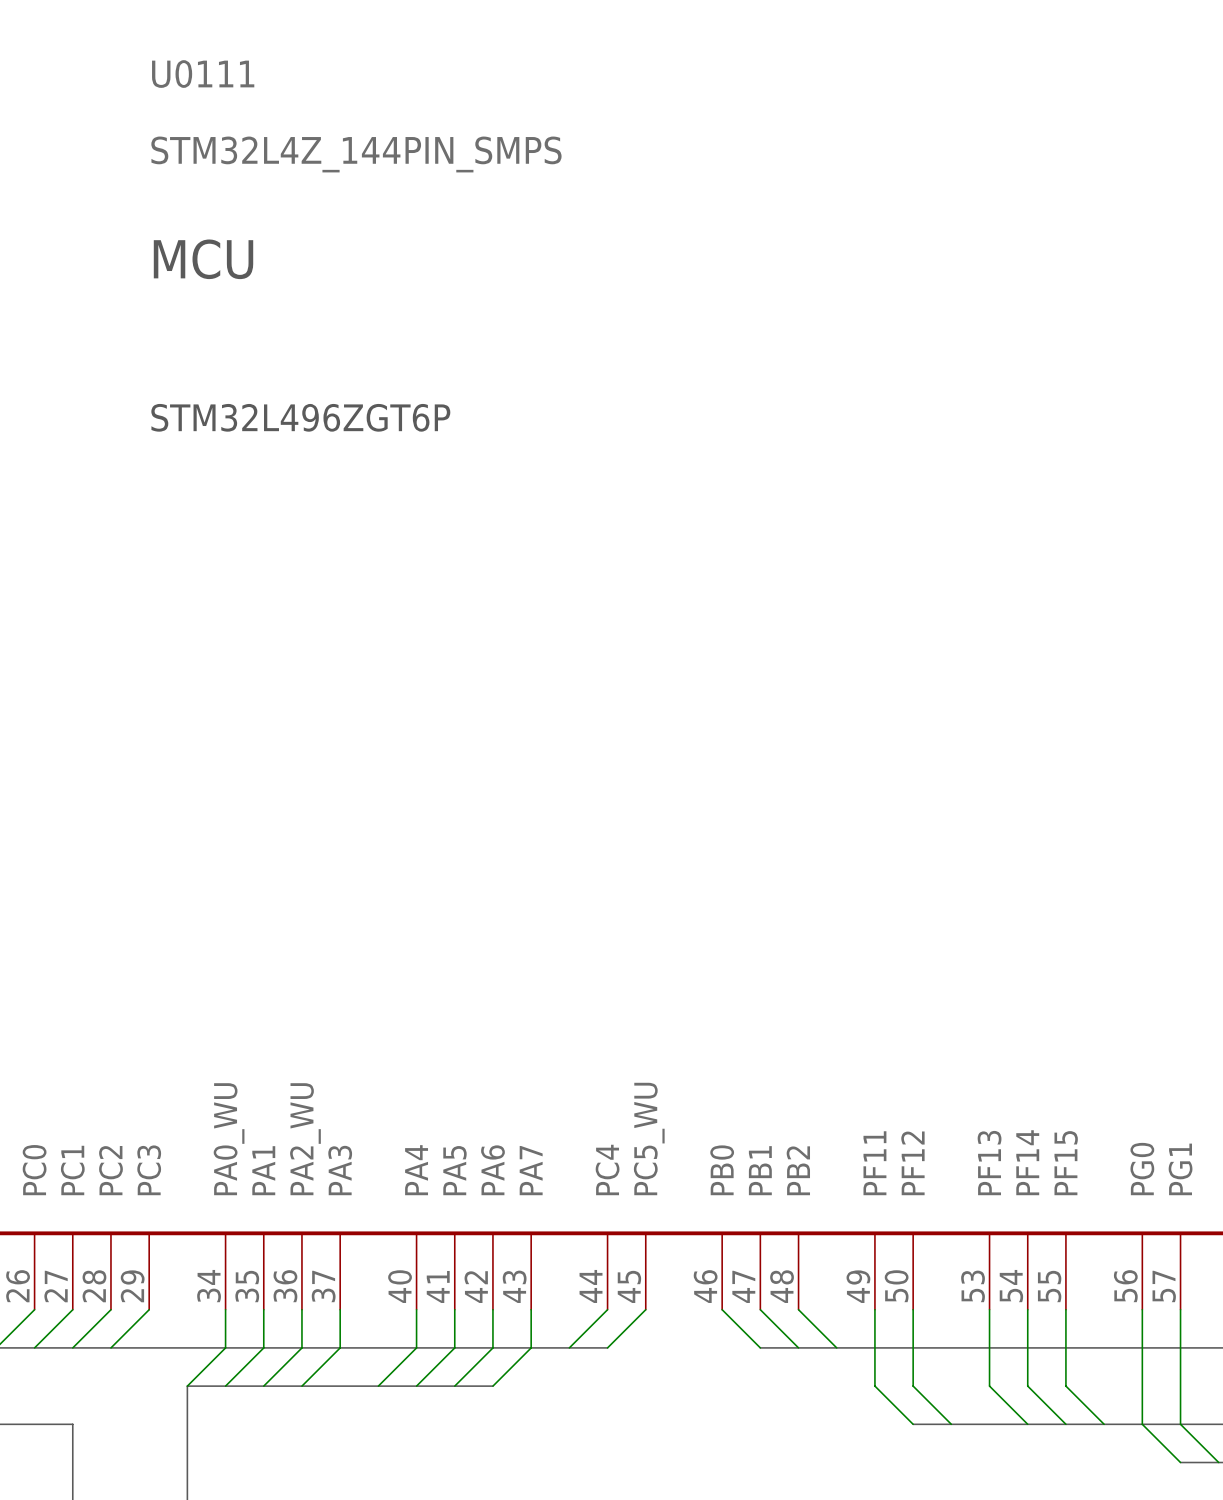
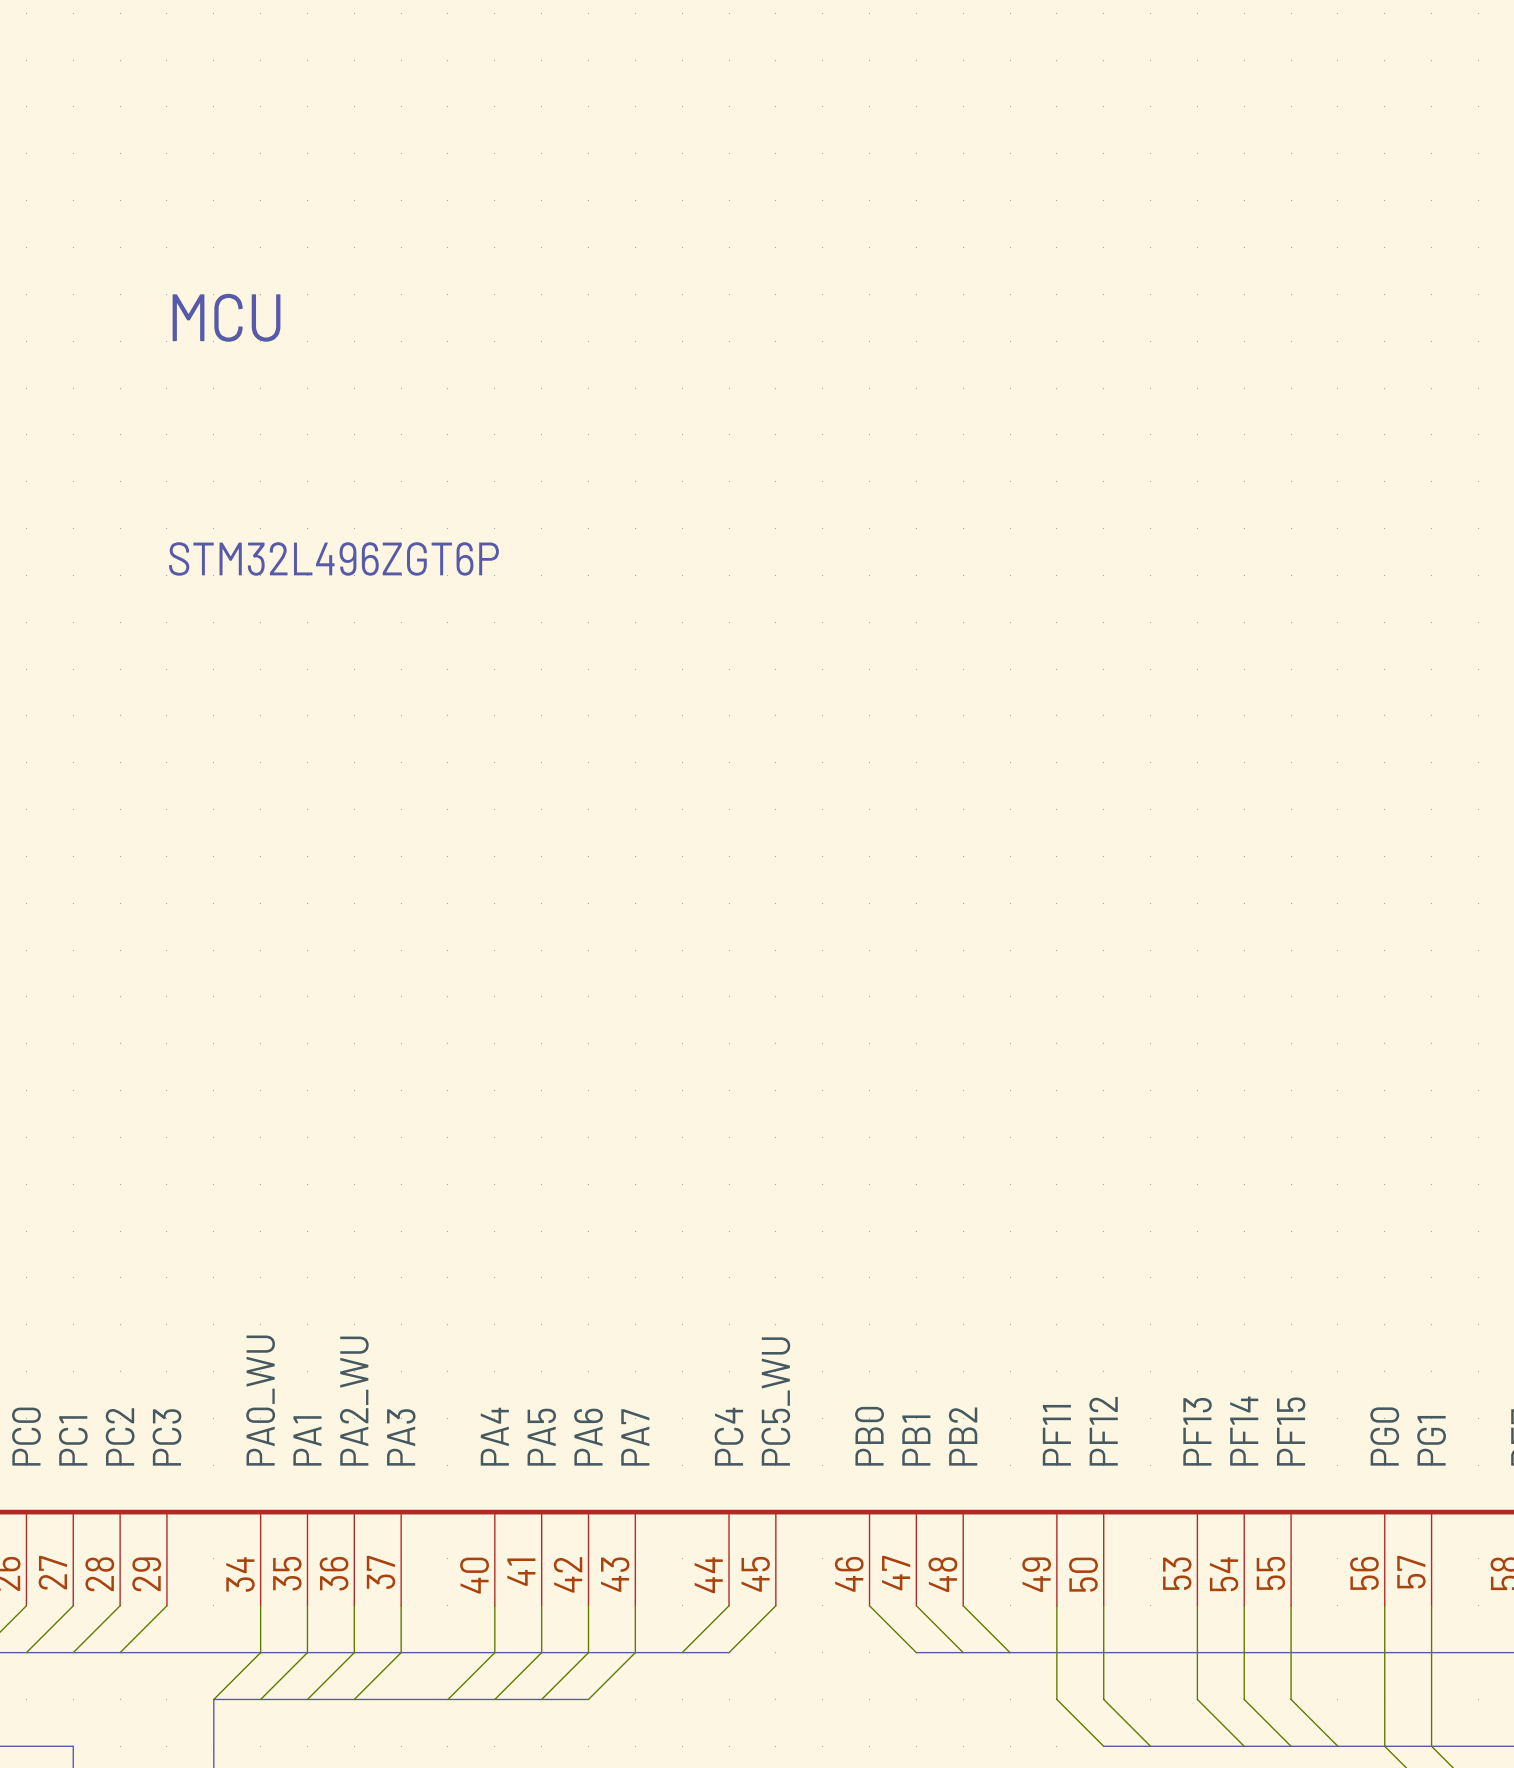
U0111 name: U0111 (203, 74) -> none
U0111 value: STM32L4Z_144PIN_SMPS (356, 154) -> none
text position: STM32L496ZGT6P (300, 417) -> STM32L496ZGT6P (334, 558)

